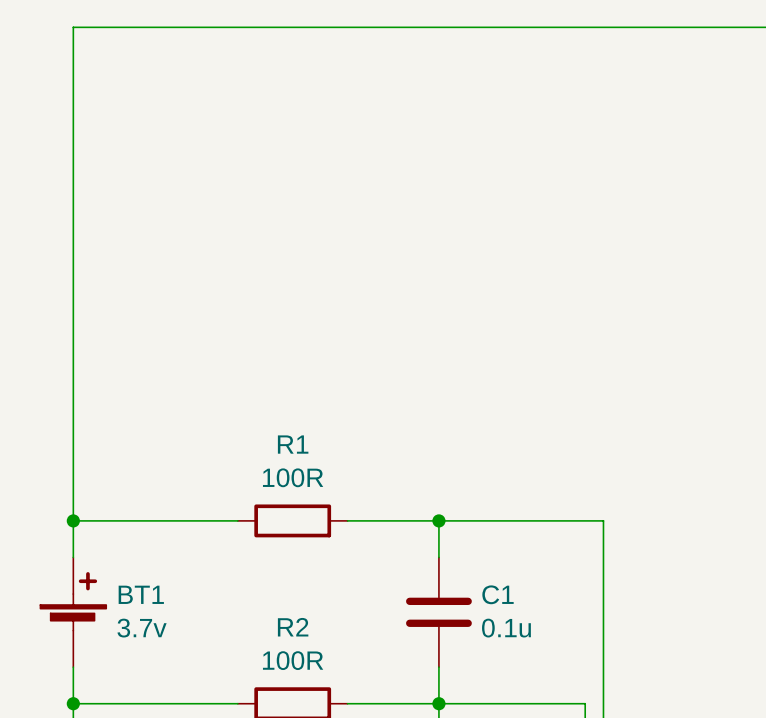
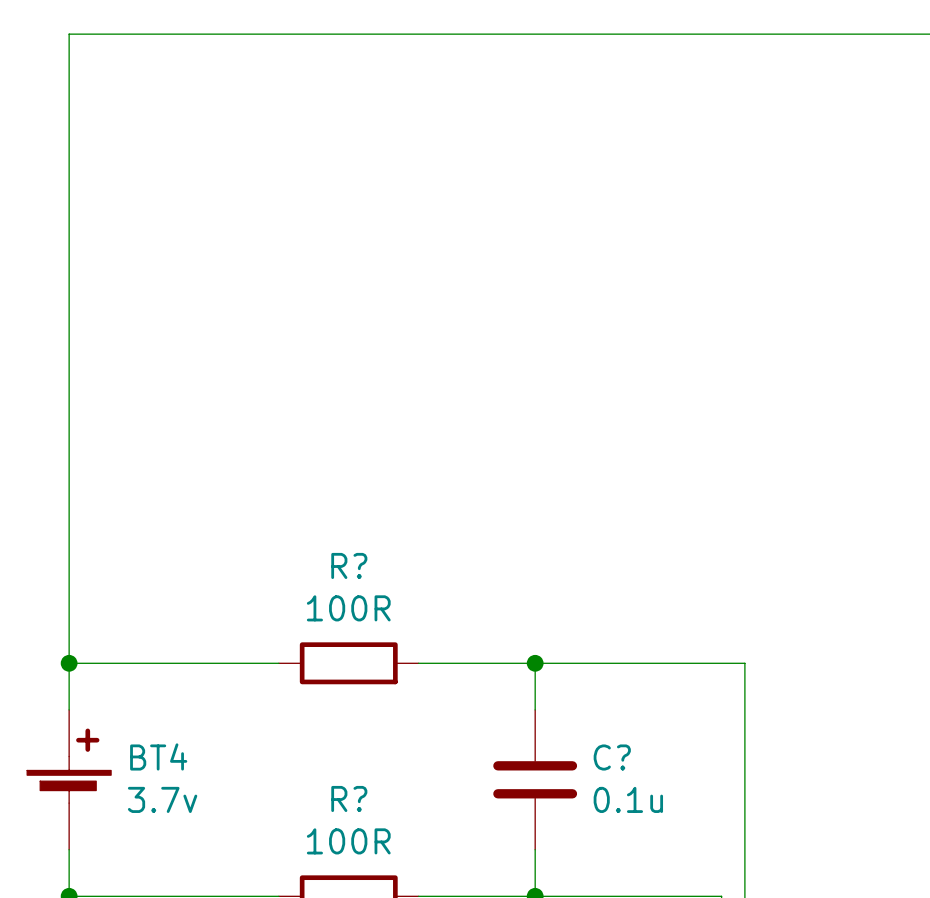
R1 name: R1 (293, 444) -> R? (349, 565)
BT1 name: BT1 (141, 594) -> BT4 (158, 756)
C1 name: C1 (498, 594) -> C? (612, 757)
R2 name: R2 (293, 627) -> R? (349, 798)

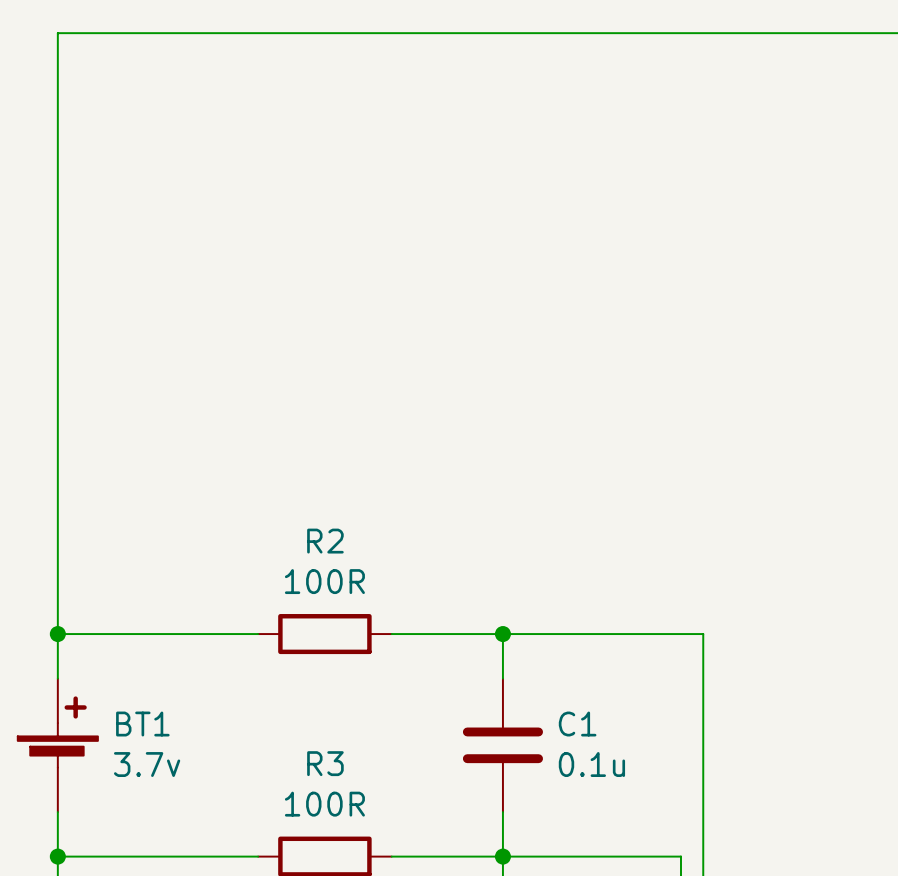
R? name: R? (349, 565) -> R2 (325, 541)
BT4 name: BT4 (158, 756) -> BT1 (142, 724)
C? name: C? (612, 757) -> C1 (577, 724)
R? name: R? (349, 798) -> R3 (325, 763)

